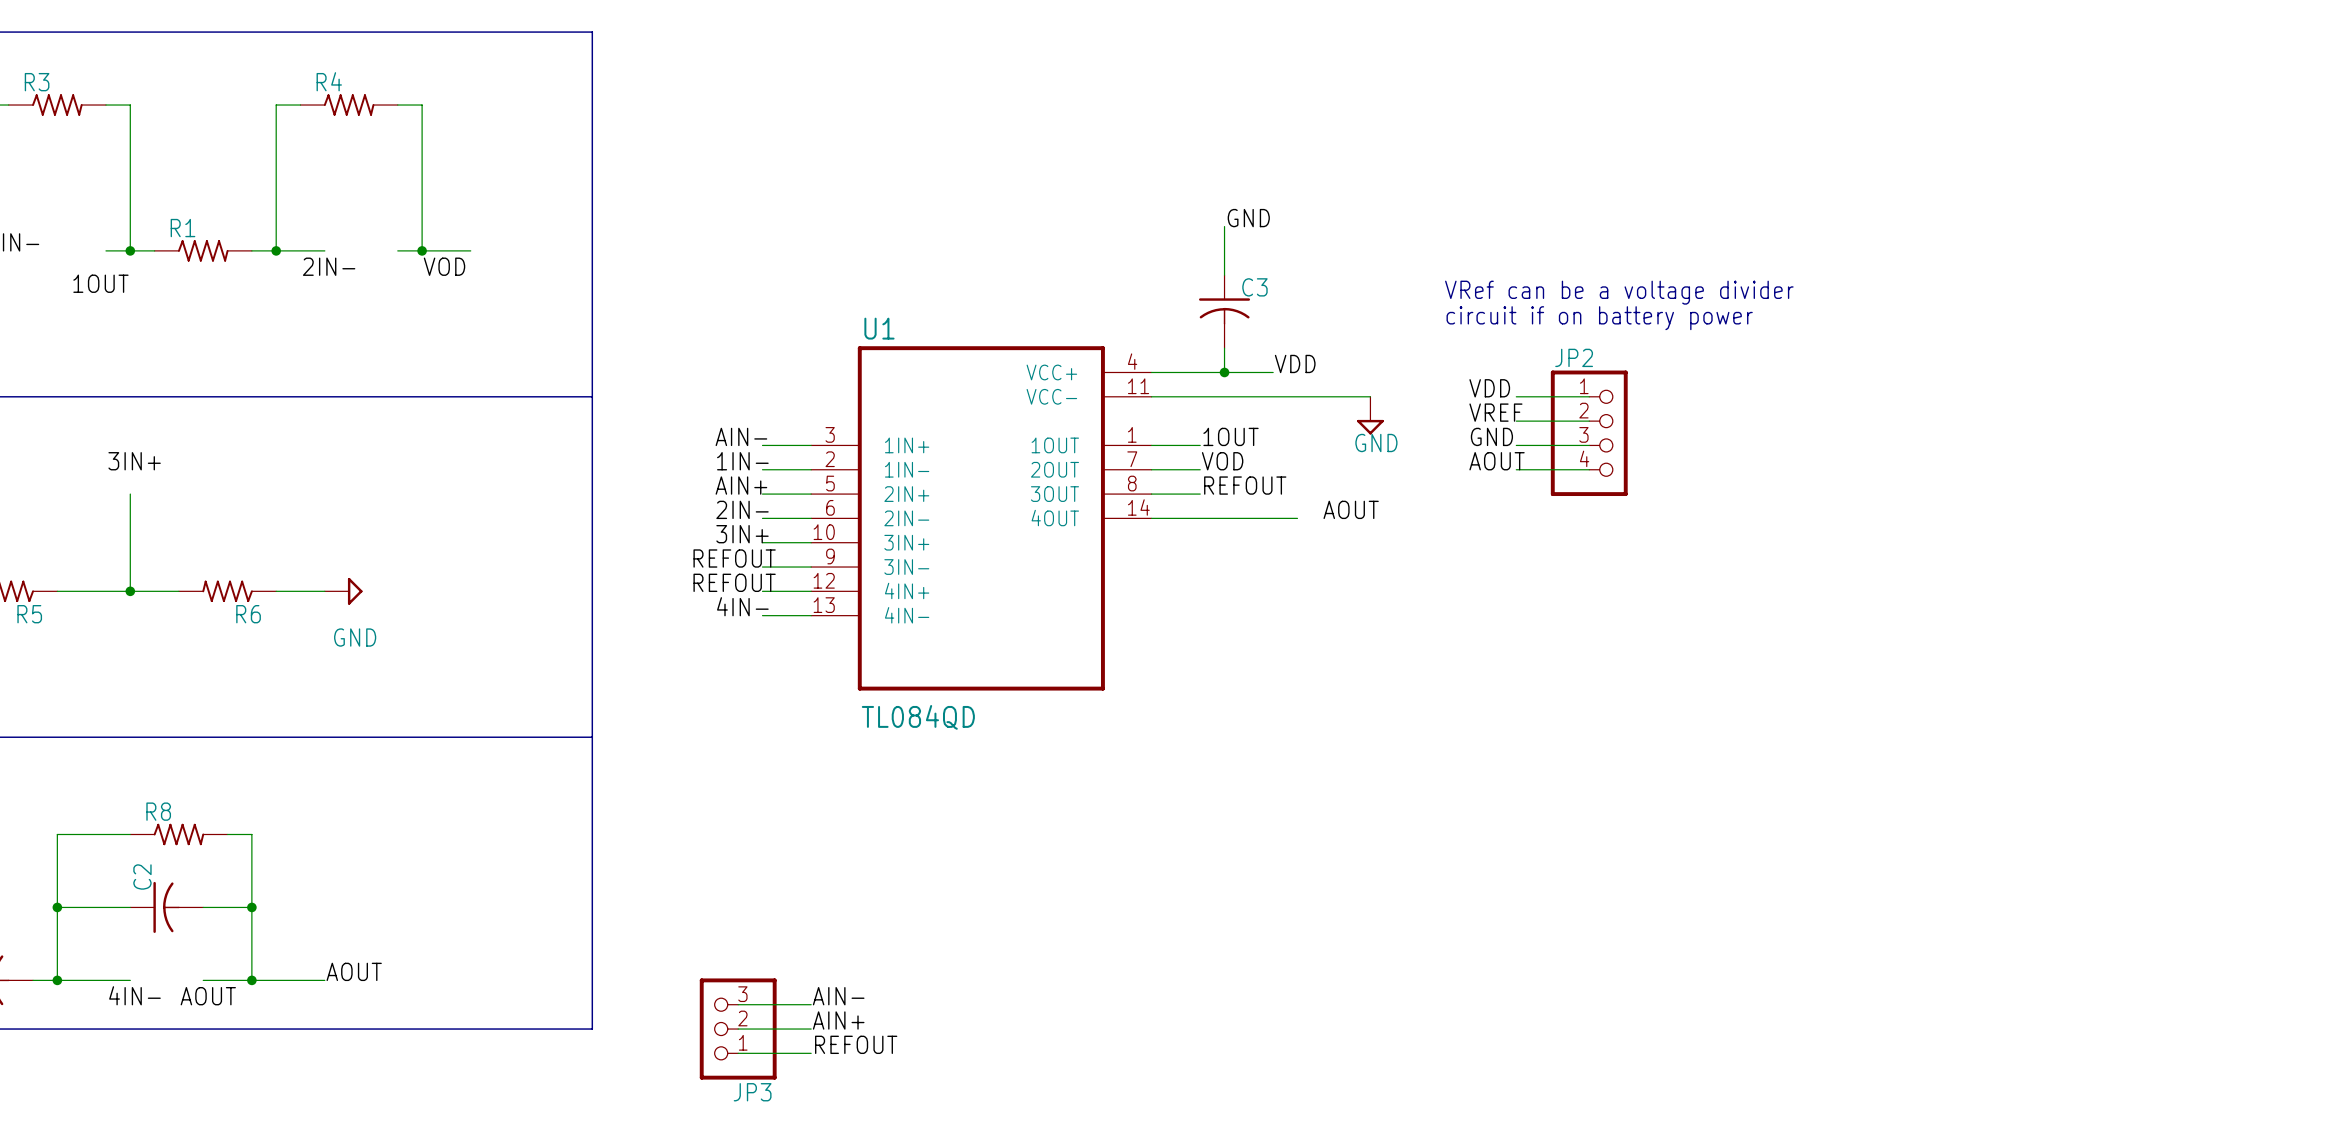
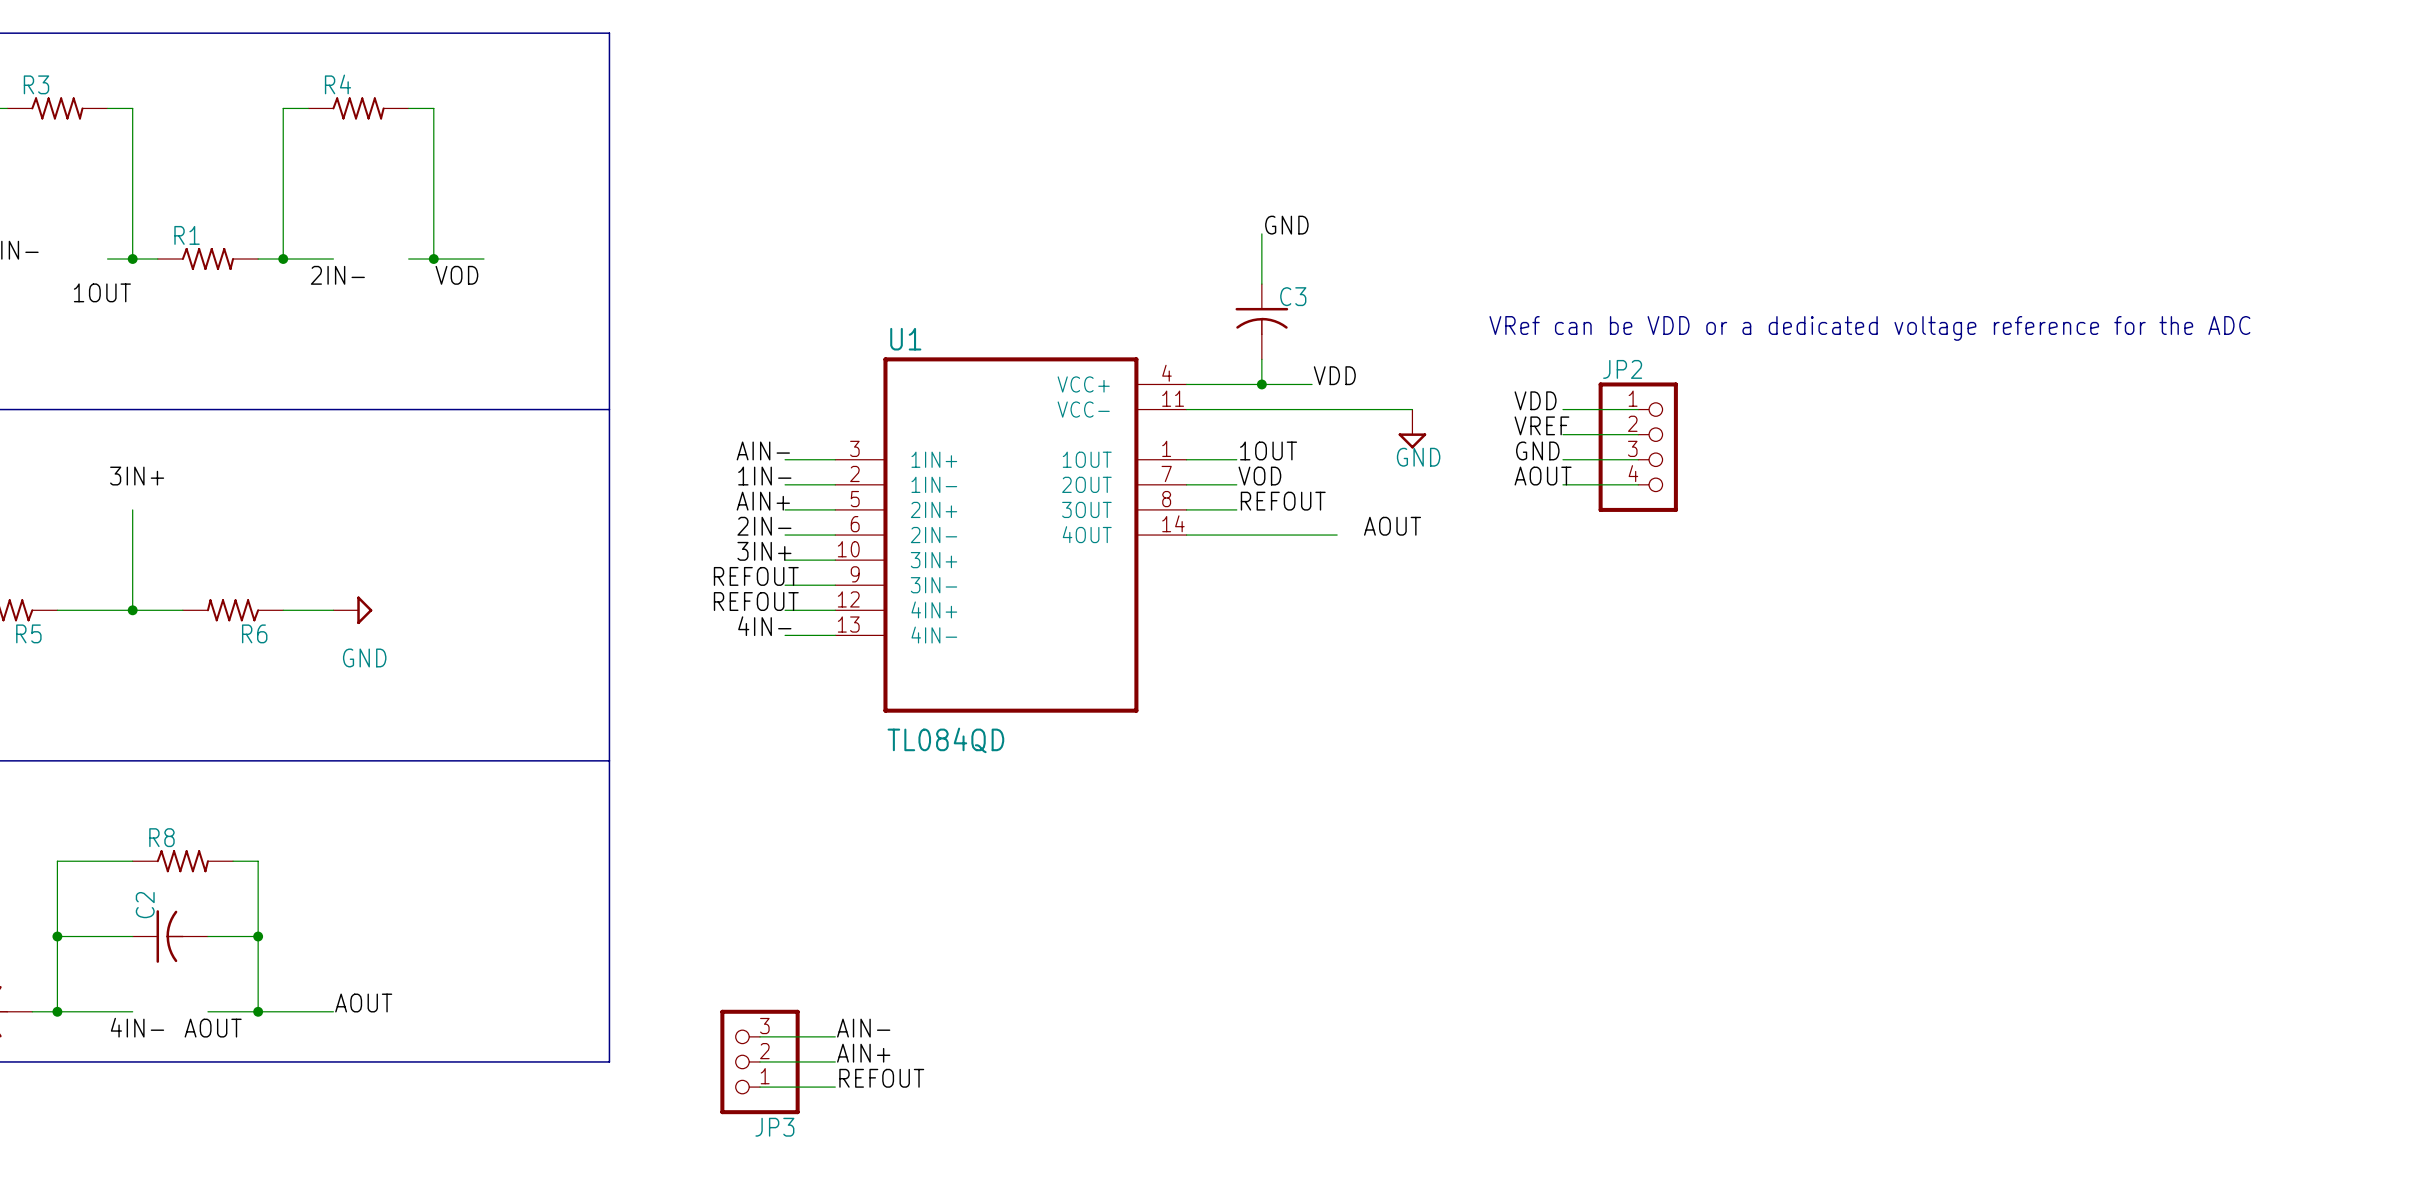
text: VRef can be a voltage divider (1619, 292) -> none
text: circuit if on battery power (1599, 318) -> VRef can be VDD or a dedicated voltage reference for the ADC (1869, 328)

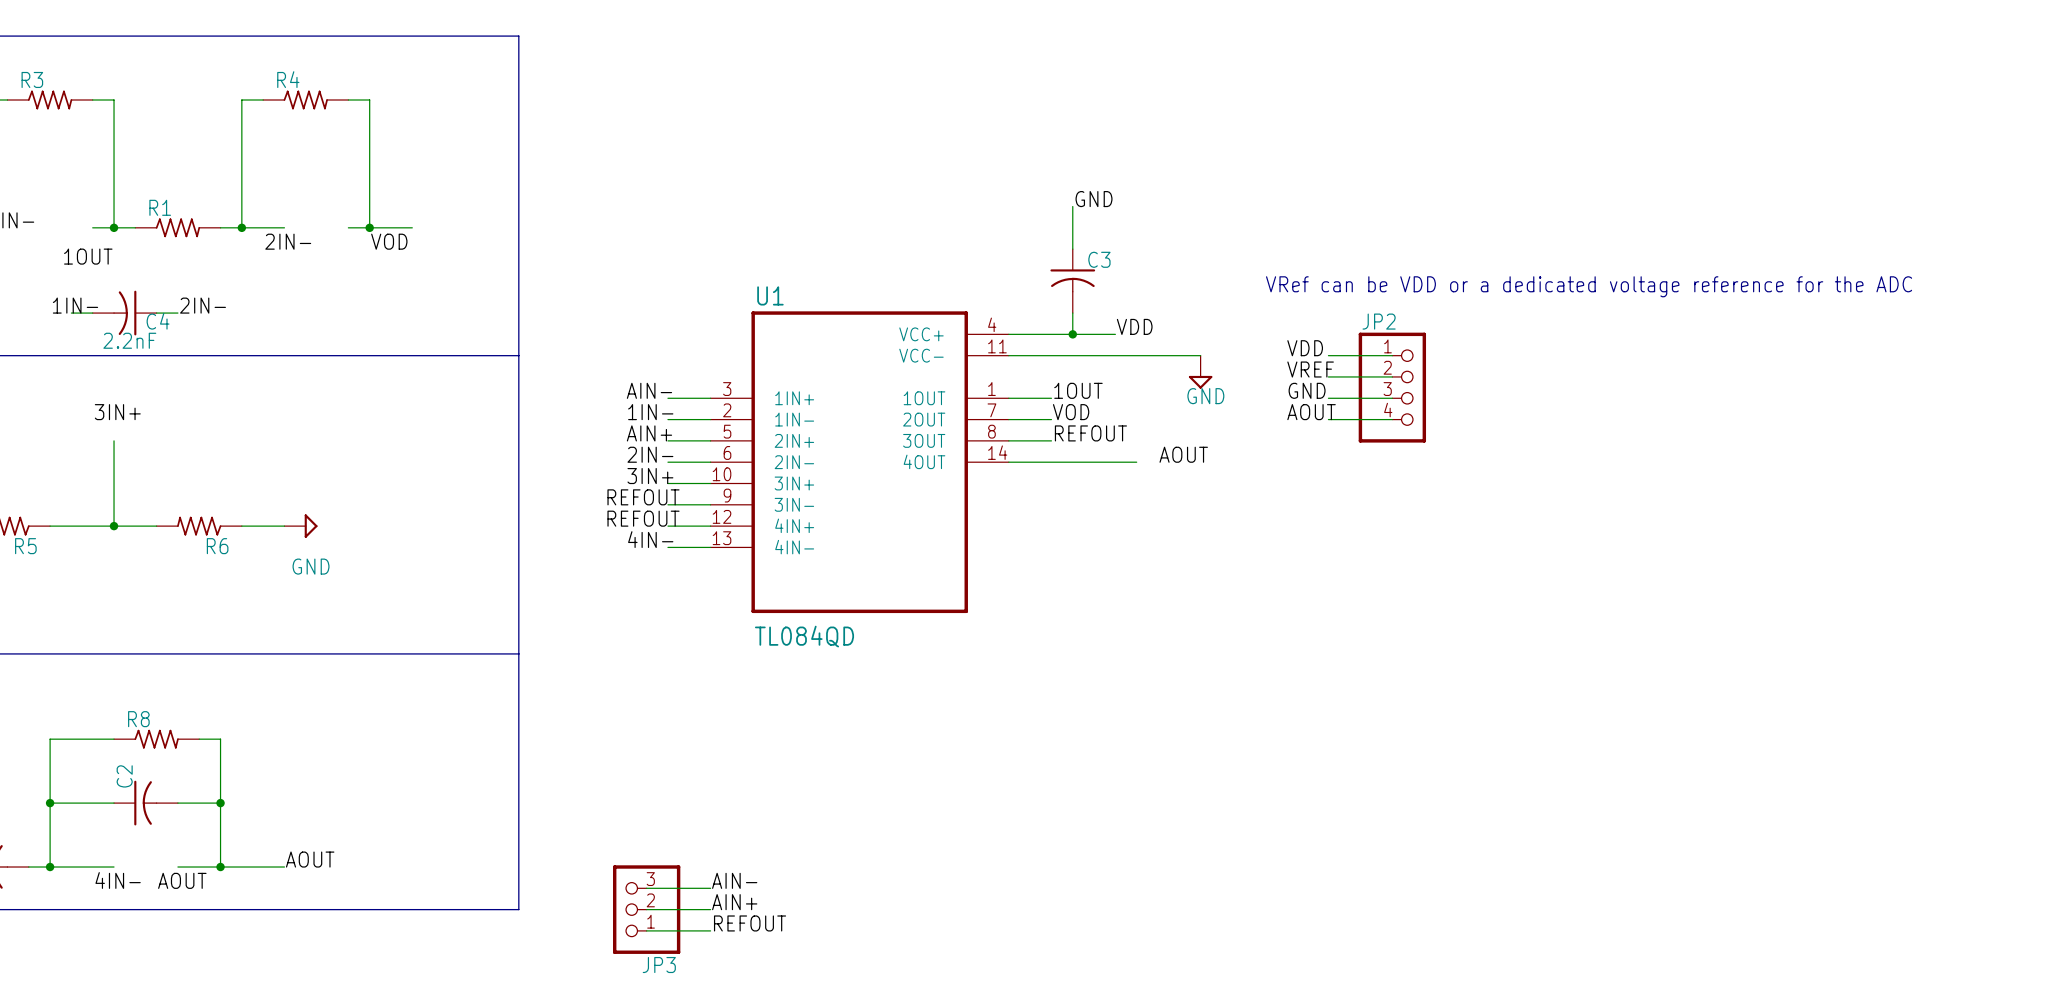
label: none -> 1IN- (75, 305)
label: none -> 2IN- (203, 305)
wire: none -> (71, 313) (92, 313)
C4: none -> 2.2nF (124, 313)
wire: none -> (156, 313) (177, 313)

